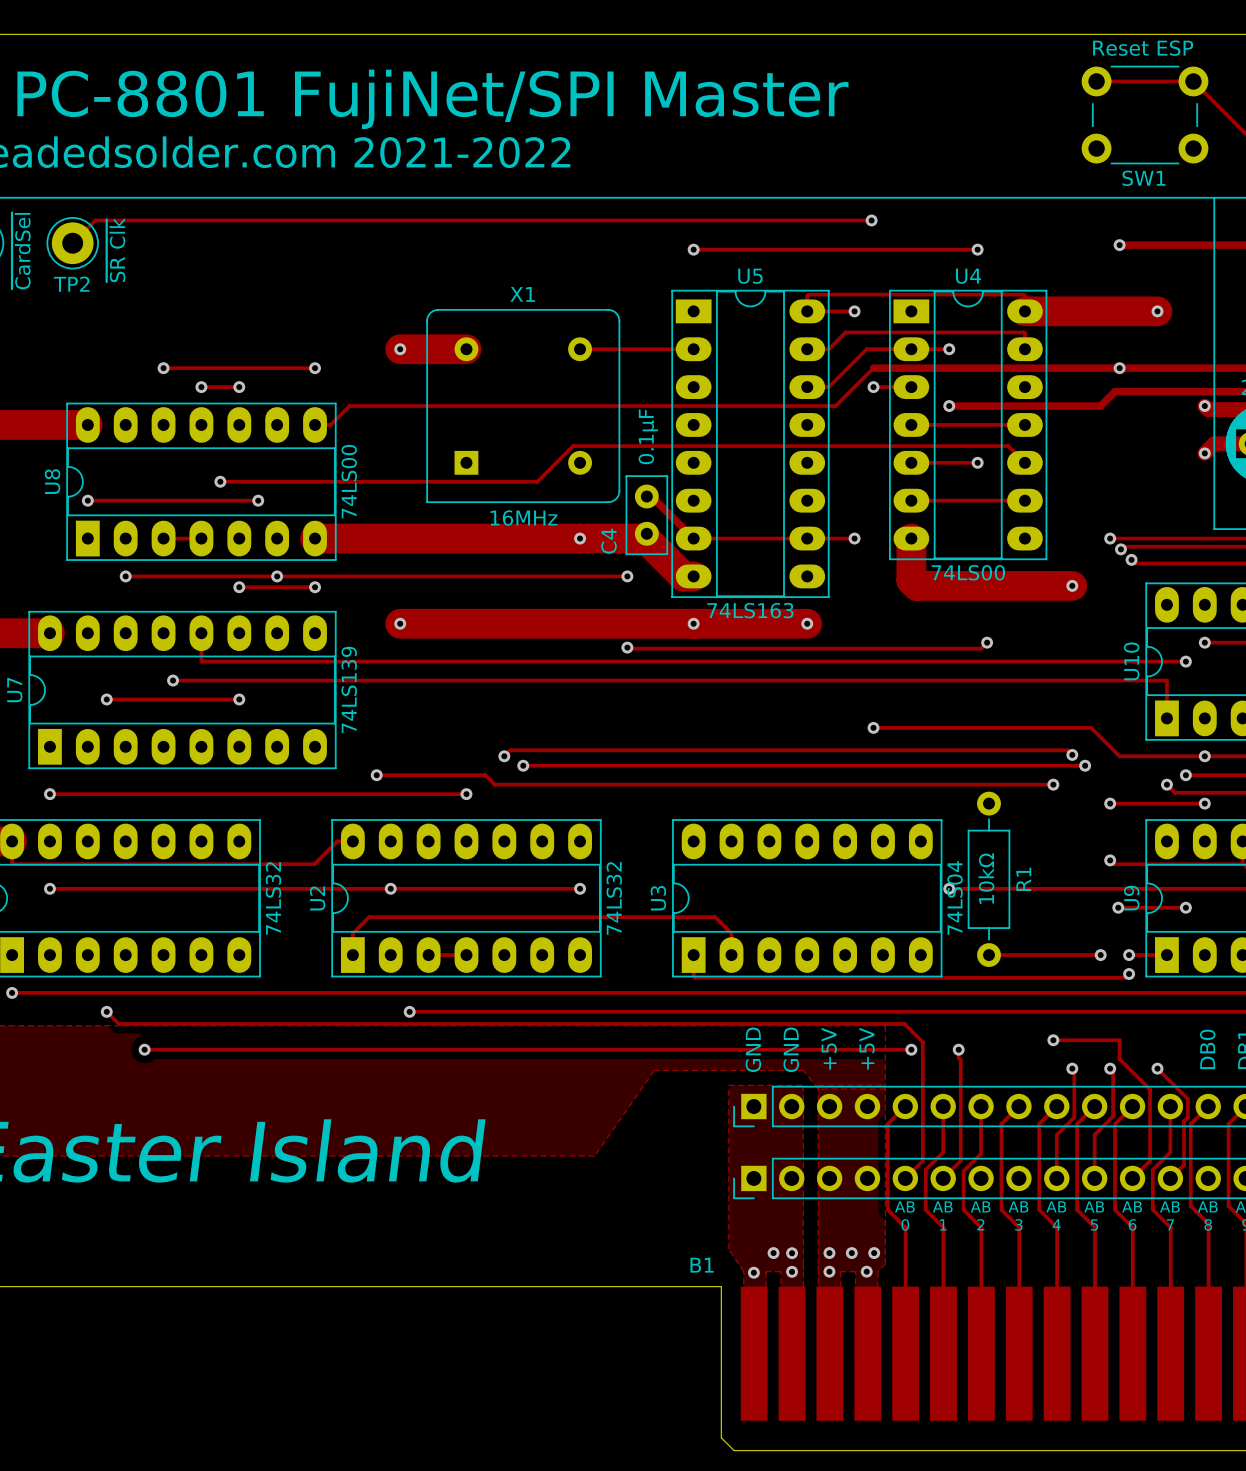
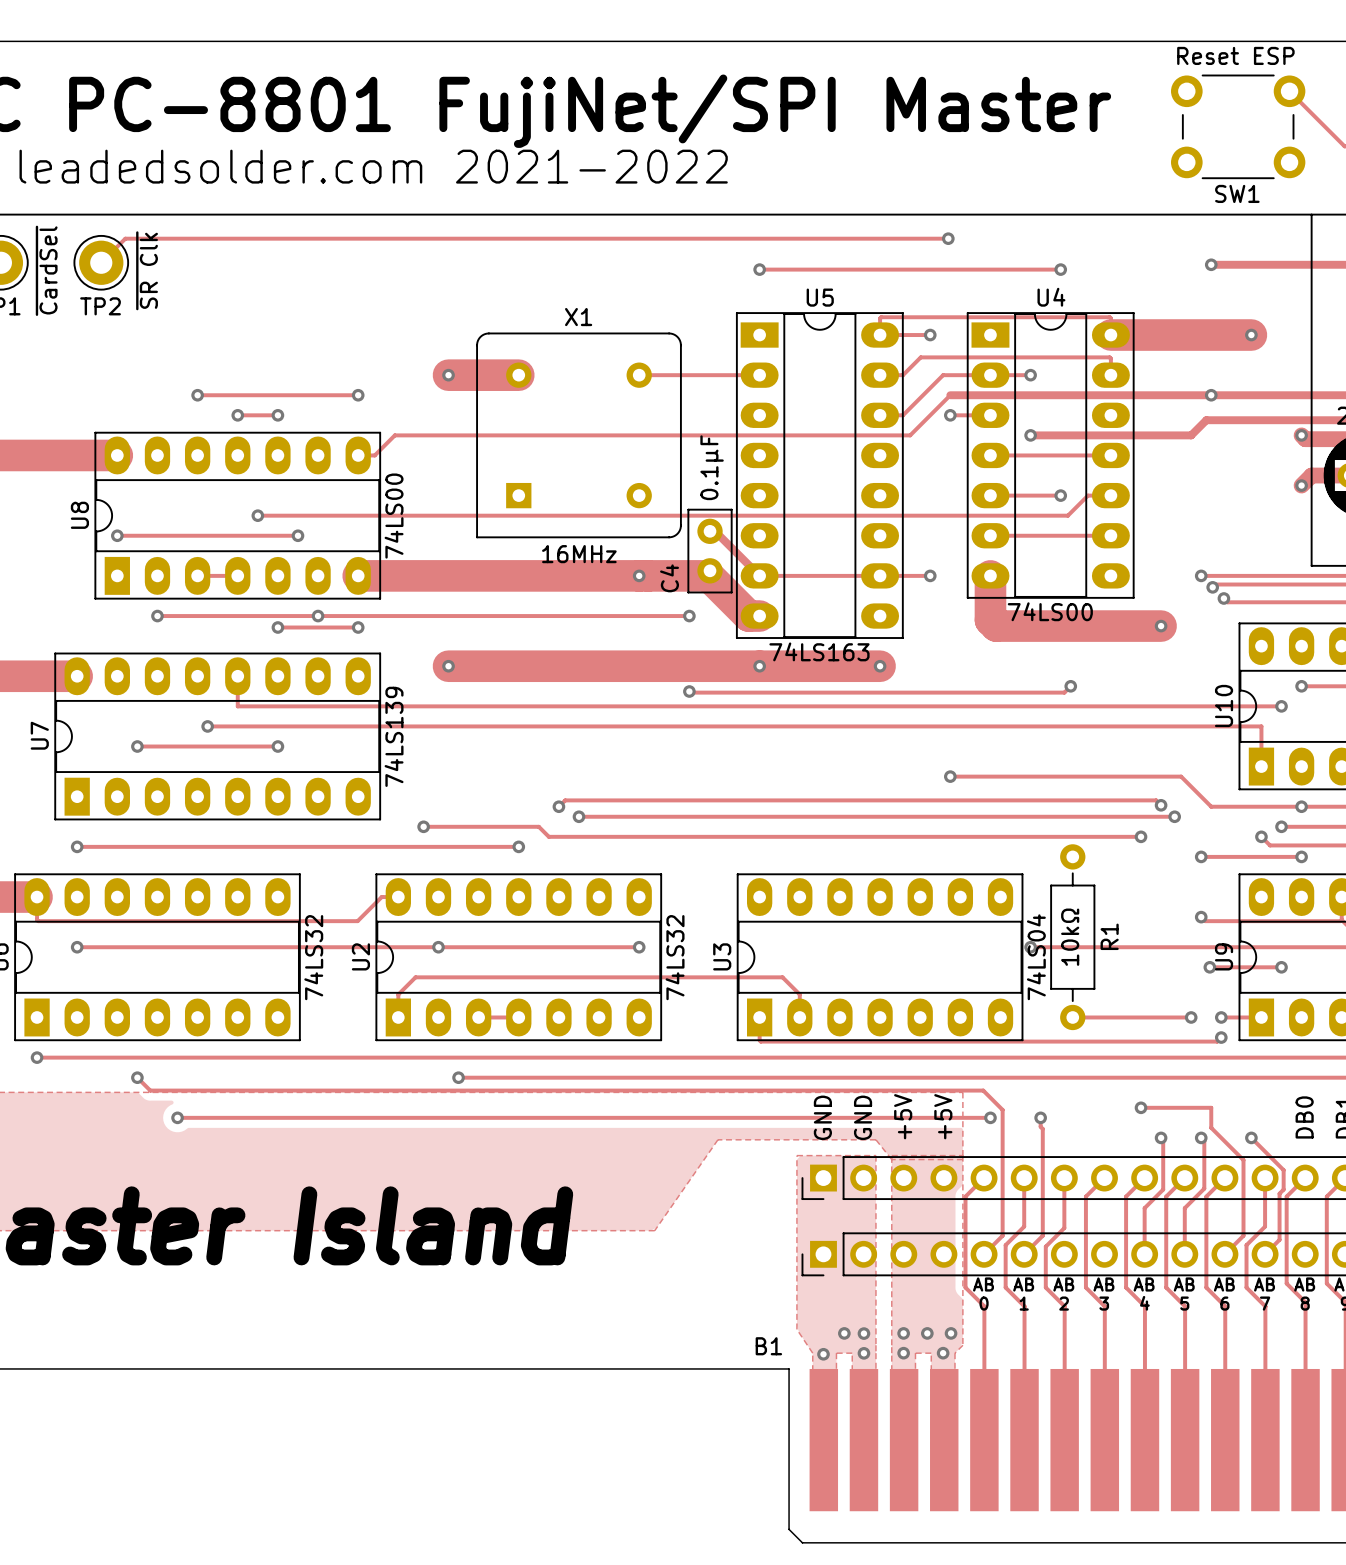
track: (1096, 81) (1193, 81) -> none
track: (1024, 462) (1008, 446) (573, 446) (537, 481) -> (1110, 495) (1087, 495) (1067, 515) (594, 515)

